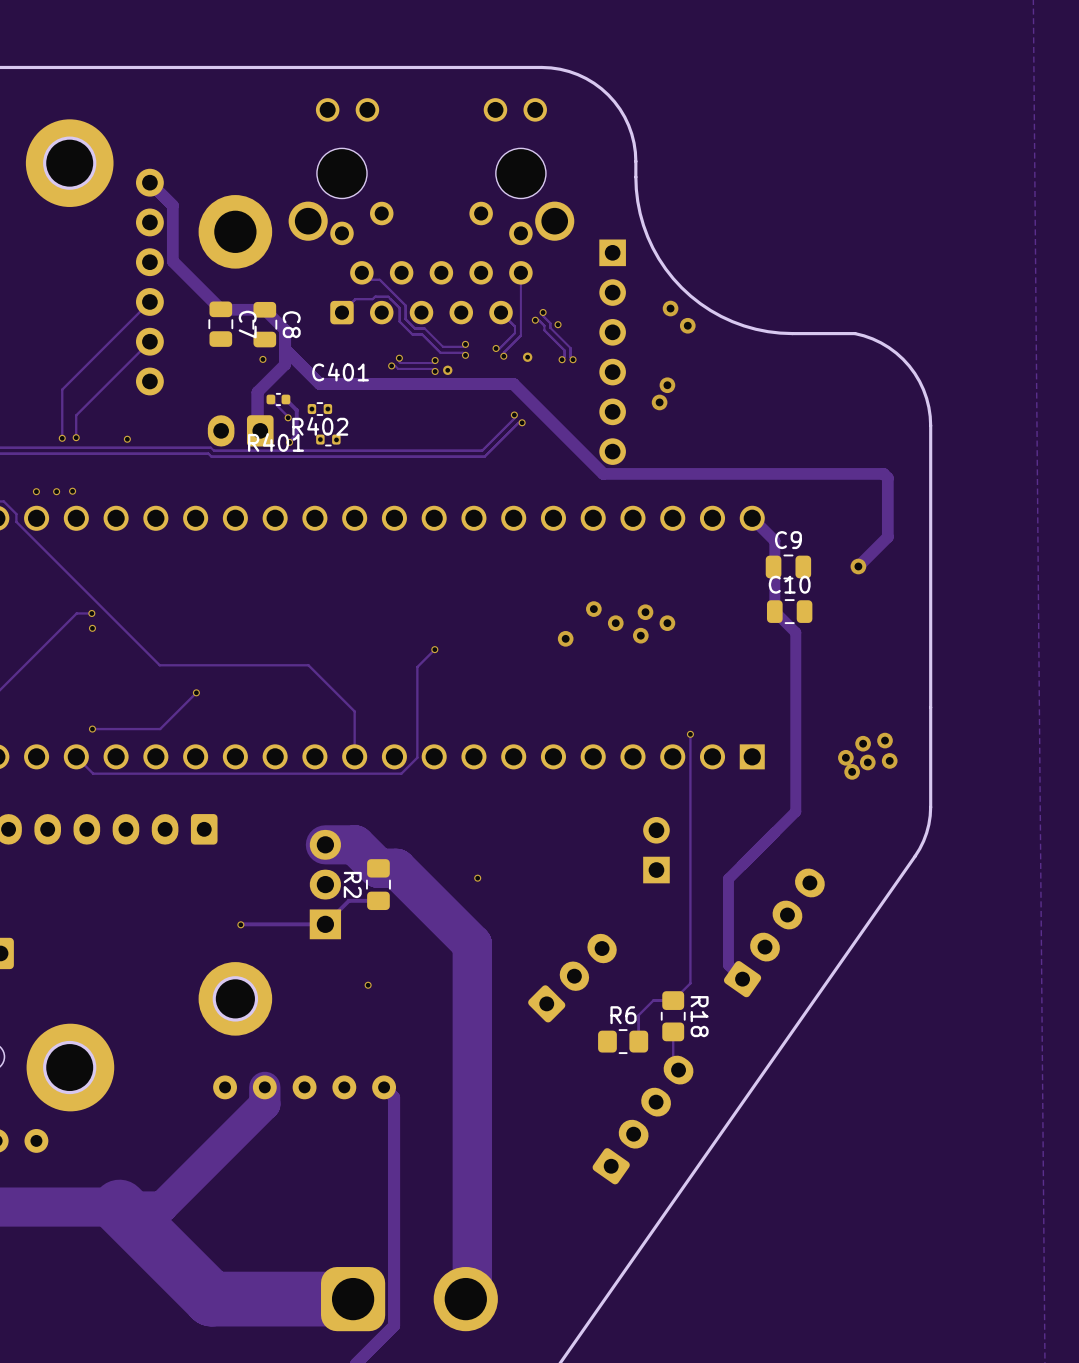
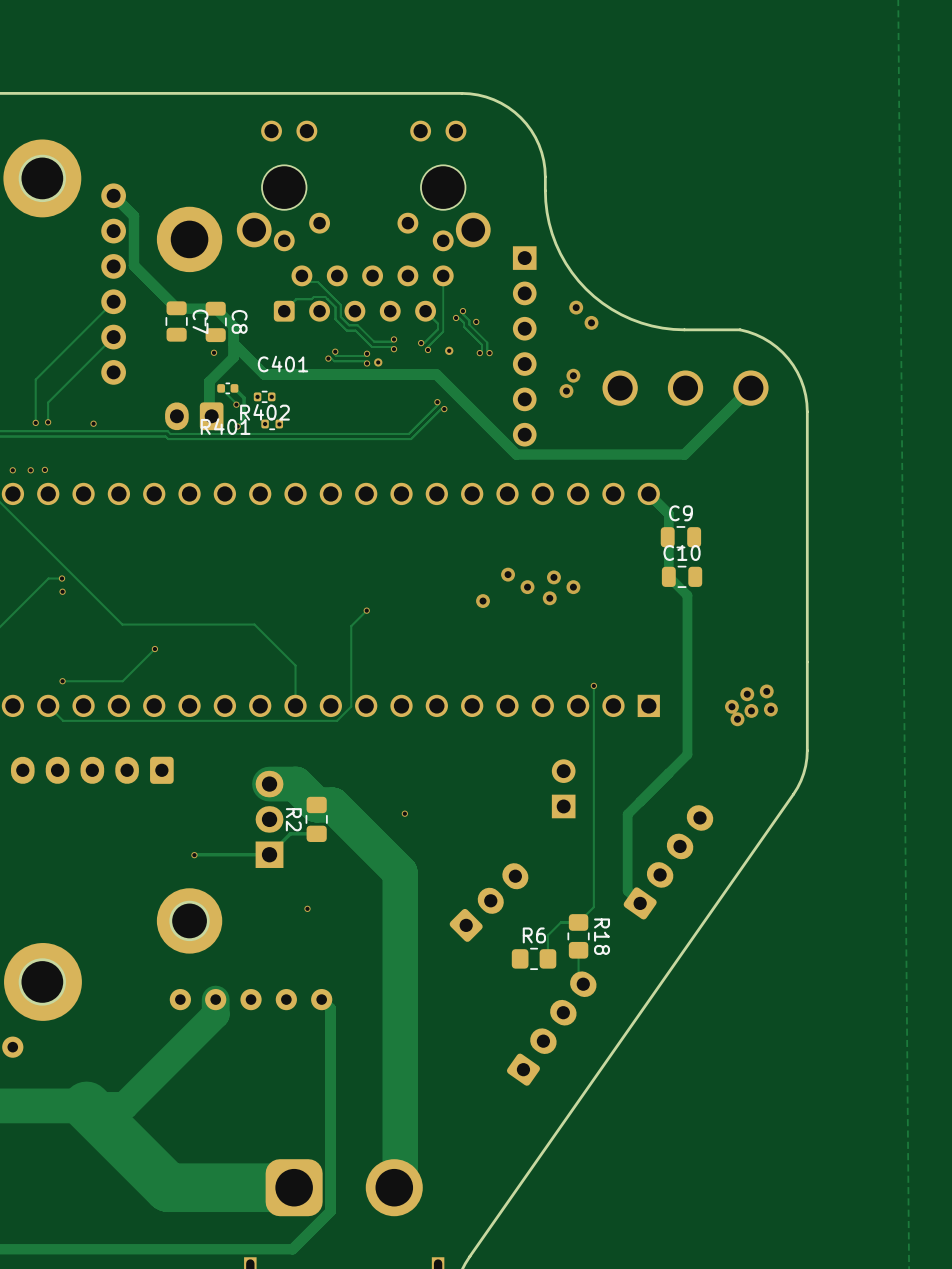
part: none -> (685, 388)
track: (792, 473) (883, 473) (887, 478) (887, 537) (858, 566) -> (684, 454) (750, 388)
via: (858, 566) -> none

